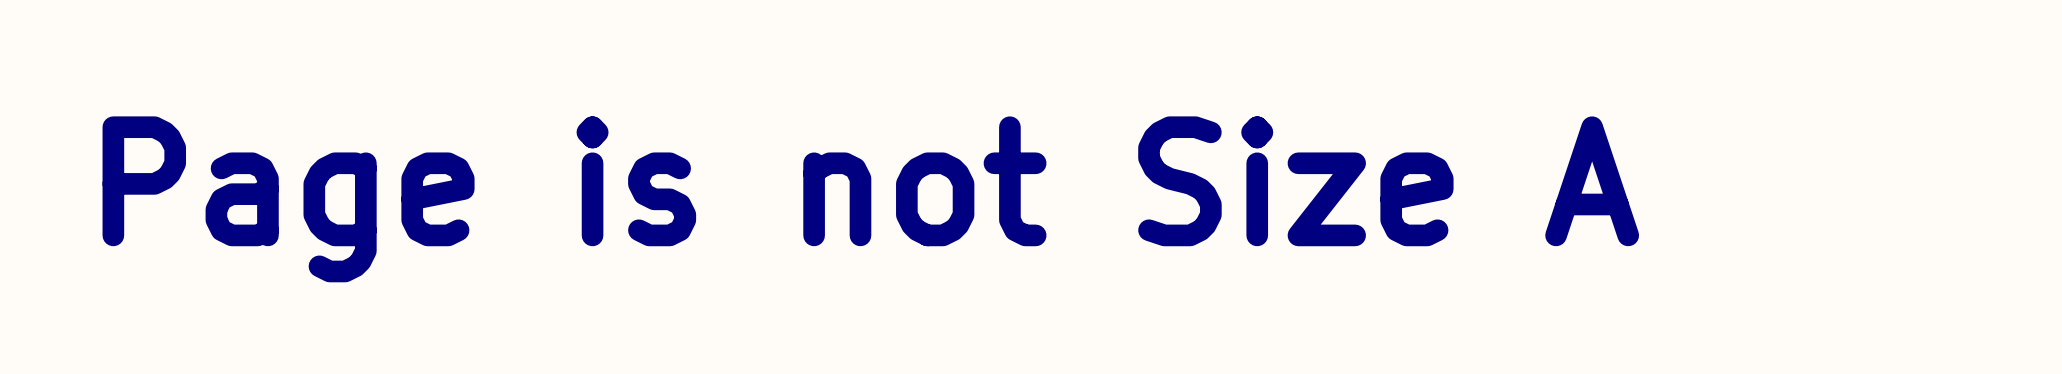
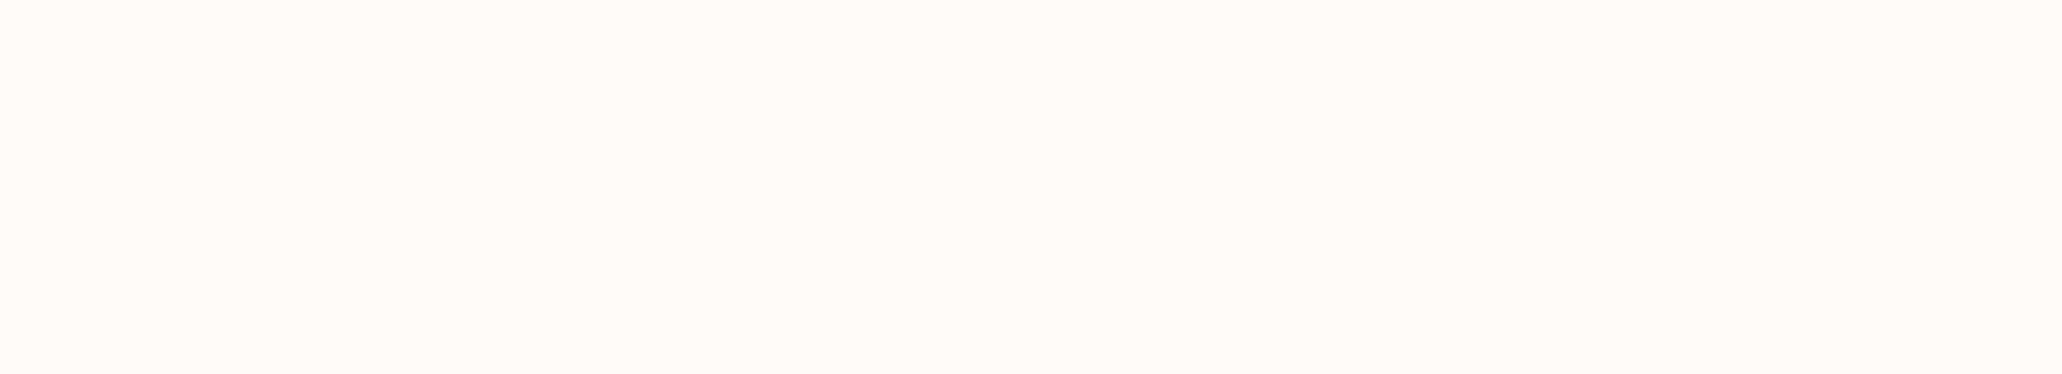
text: Page is not Size A (870, 199) -> none

